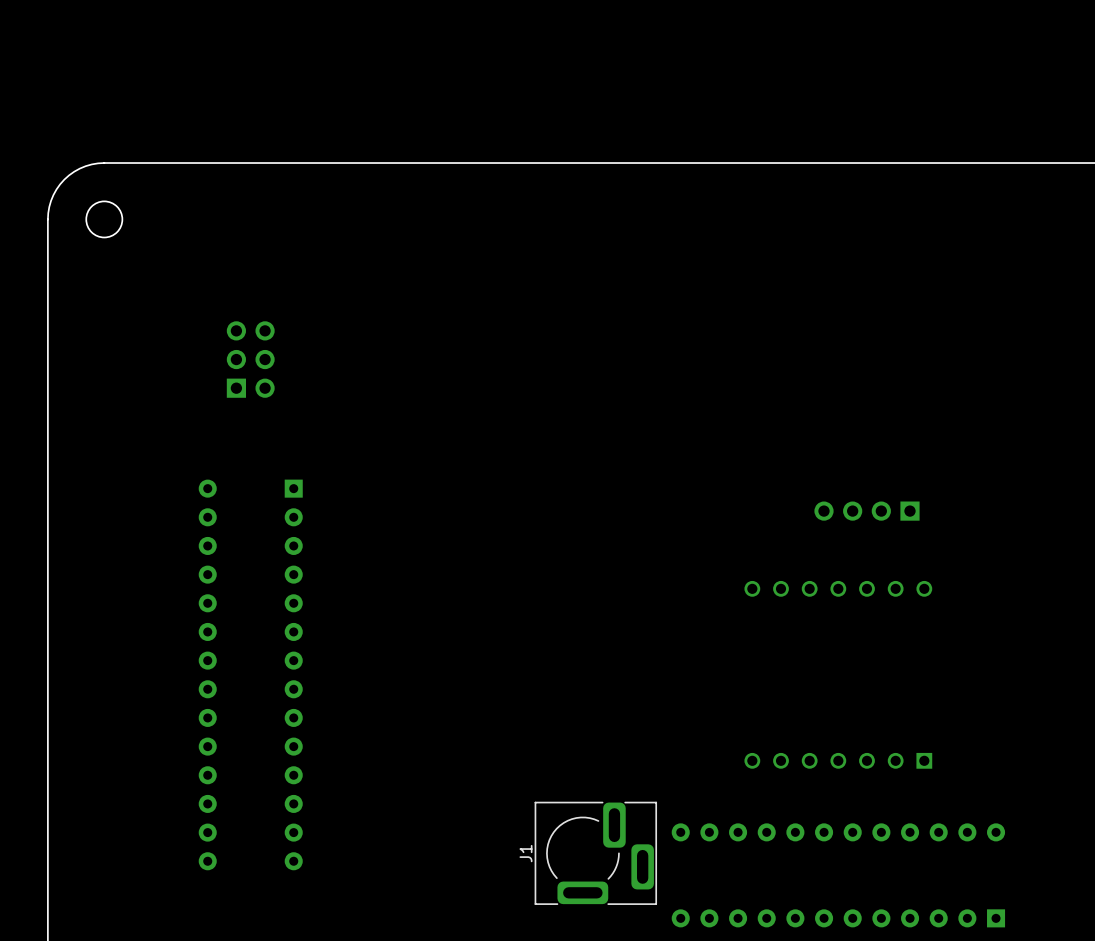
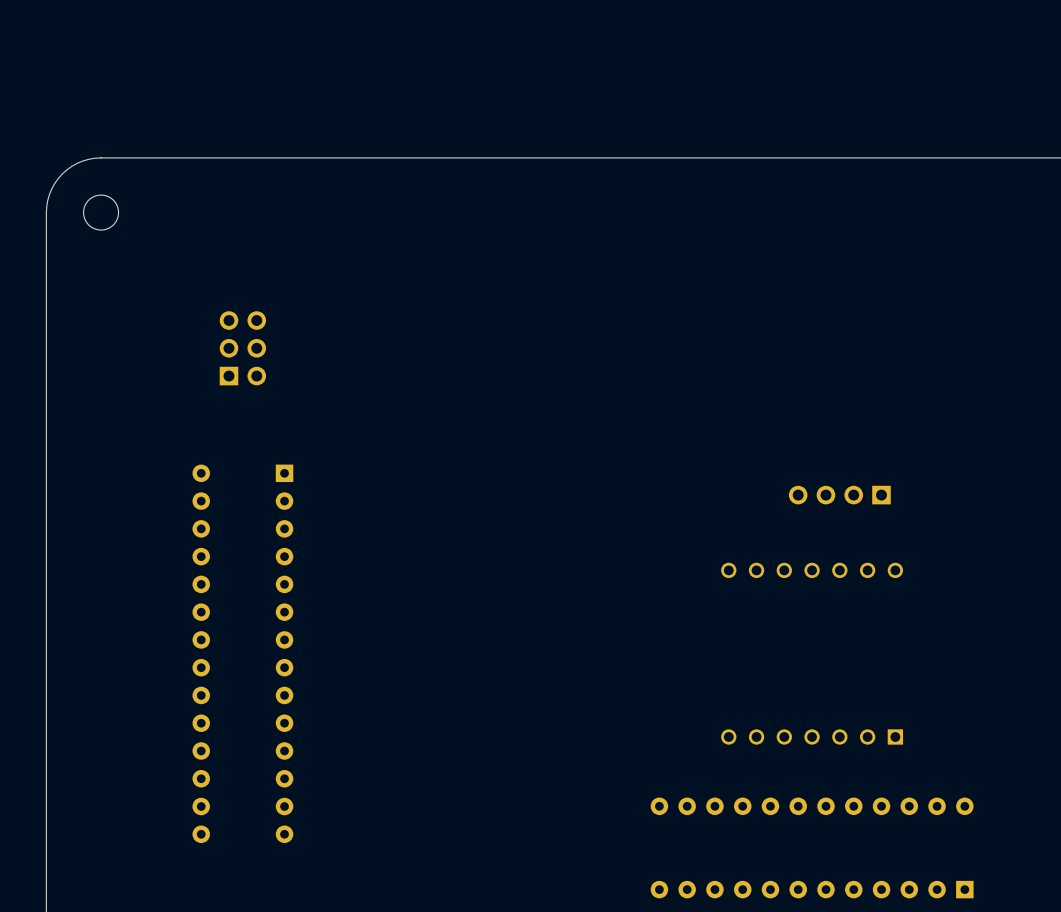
J1: (595, 853) -> none

